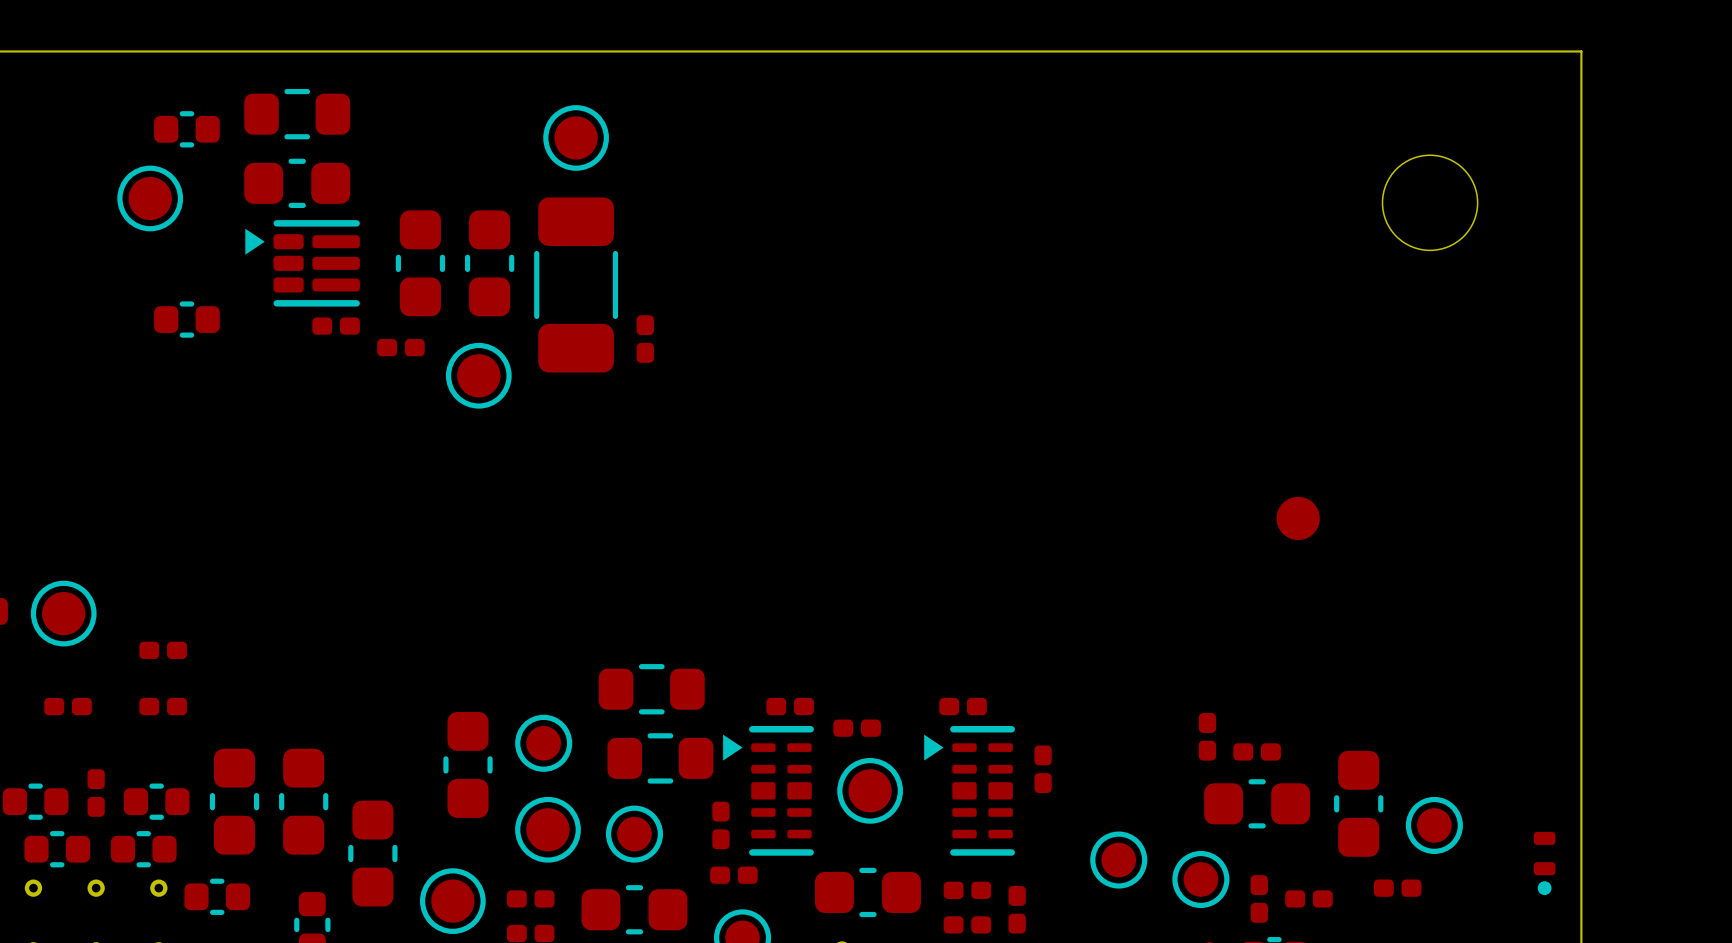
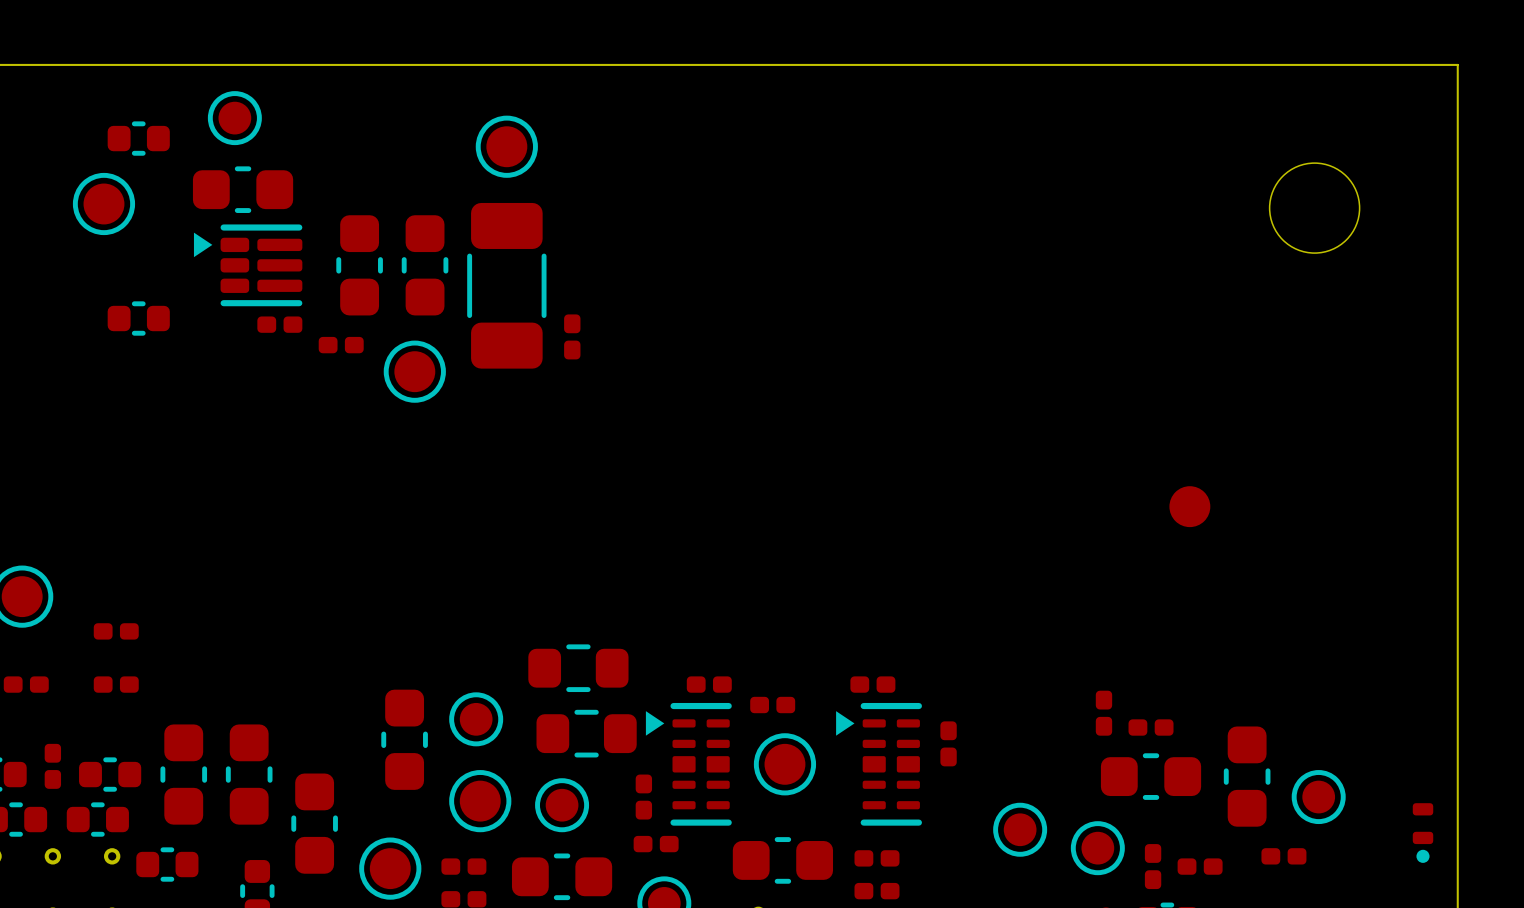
part footprint: [244, 88, 351, 140] -> [207, 91, 262, 146]
part: (1017, 909) -> none

